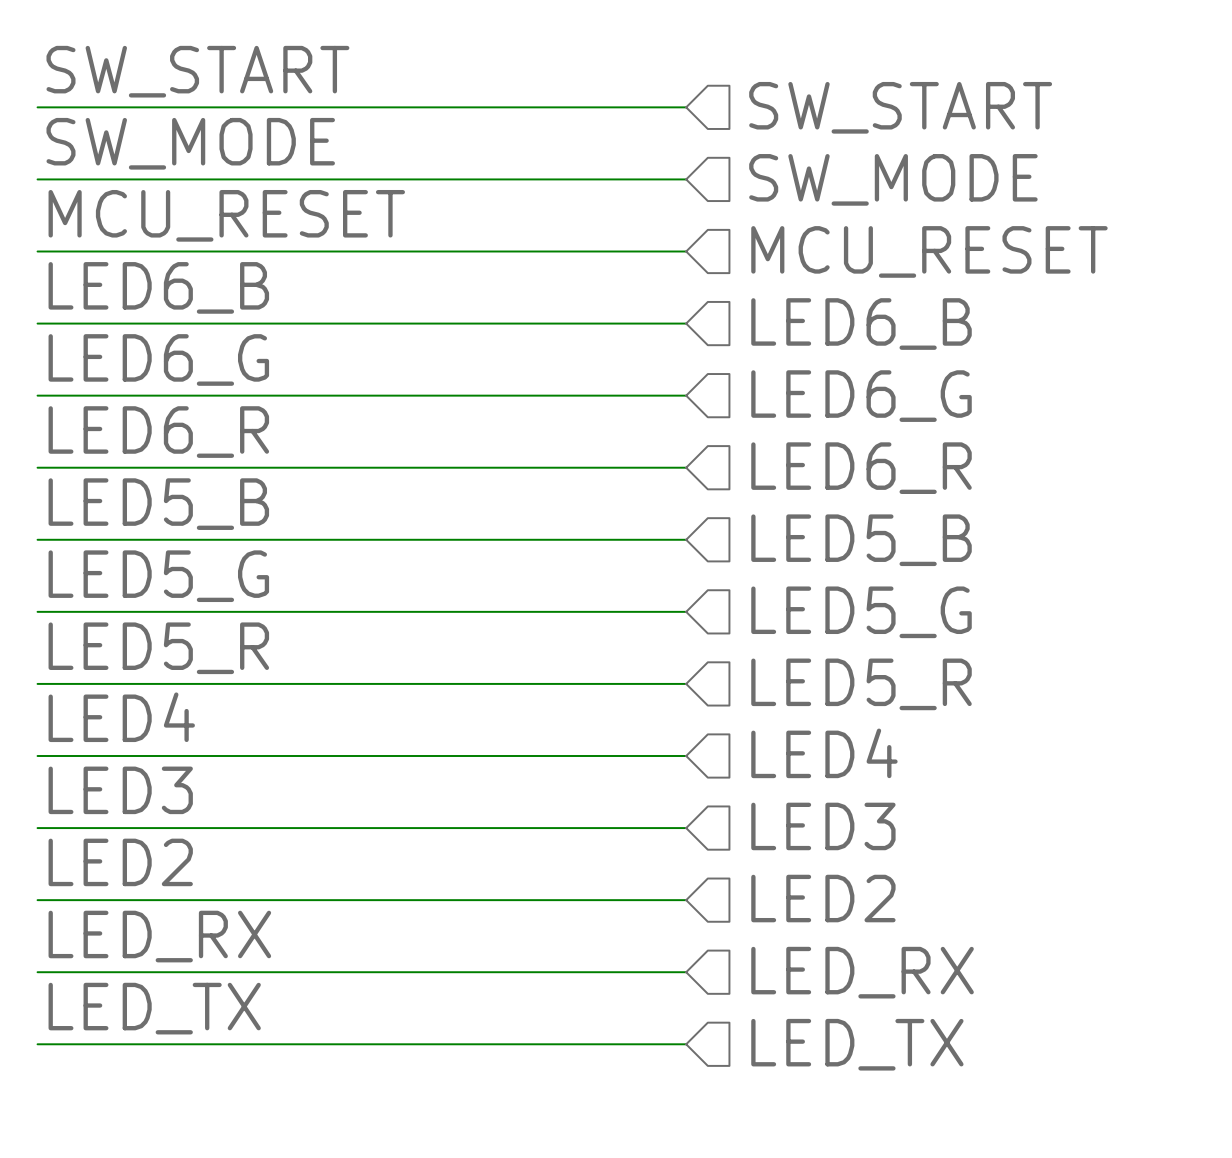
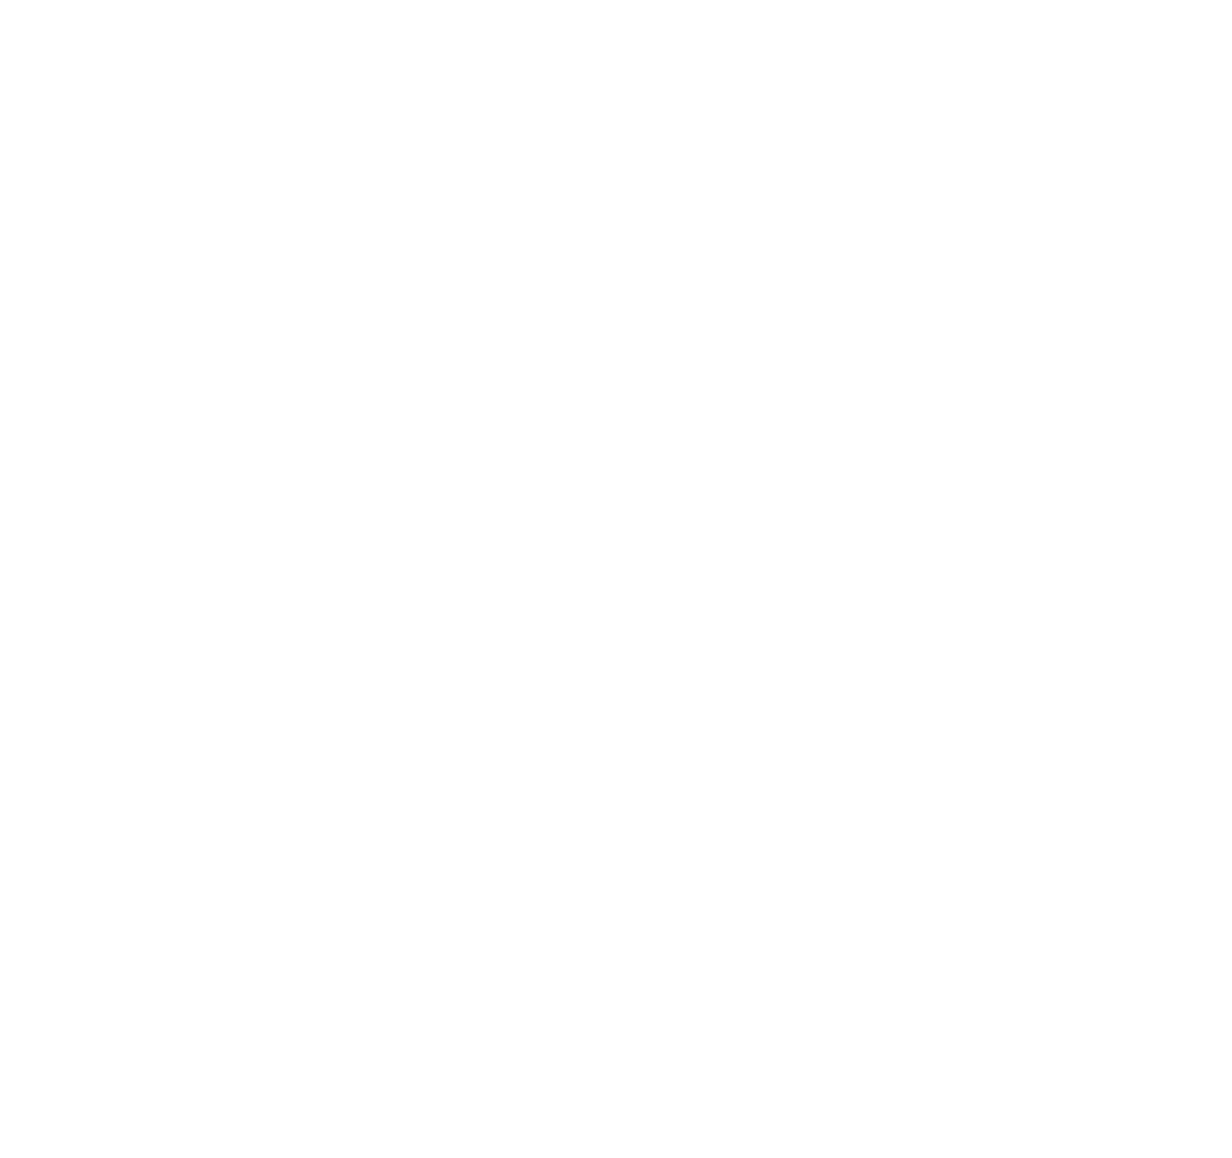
label: SW_START (197, 71) -> none
wire: (37, 107) (686, 107) -> none
hierarchical label: SW_START (900, 107) -> none
label: SW_MODE (190, 143) -> none
wire: (37, 179) (686, 179) -> none
hierarchical label: SW_MODE (893, 179) -> none
label: MCU_RESET (226, 215) -> none
wire: (37, 251) (686, 251) -> none
hierarchical label: MCU_RESET (929, 251) -> none
label: LED6_B (158, 287) -> none
wire: (37, 323) (686, 323) -> none
hierarchical label: LED6_B (861, 324) -> none
label: LED6_G (158, 359) -> none
wire: (37, 395) (686, 395) -> none
hierarchical label: LED6_G (861, 396) -> none
label: LED6_R (158, 432) -> none
wire: (37, 467) (686, 467) -> none
hierarchical label: LED6_R (861, 468) -> none
label: LED5_B (158, 504) -> none
wire: (37, 539) (686, 539) -> none
hierarchical label: LED5_B (861, 540) -> none
label: LED5_G (158, 576) -> none
wire: (37, 611) (686, 611) -> none
hierarchical label: LED5_G (861, 612) -> none
label: LED5_R (158, 648) -> none
wire: (37, 683) (686, 683) -> none
hierarchical label: LED5_R (861, 684) -> none
label: LED4 (121, 717) -> none
hierarchical label: LED4 (824, 753) -> none
wire: (37, 756) (686, 756) -> none
label: LED3 (120, 790) -> none
hierarchical label: LED3 (823, 826) -> none
wire: (37, 828) (686, 828) -> none
label: LED2 (120, 862) -> none
hierarchical label: LED2 (823, 898) -> none
wire: (37, 900) (686, 900) -> none
label: LED_RX (159, 936) -> none
wire: (37, 972) (686, 972) -> none
hierarchical label: LED_RX (862, 972) -> none
label: LED_TX (154, 1008) -> none
wire: (37, 1044) (686, 1044) -> none
hierarchical label: LED_TX (857, 1044) -> none

